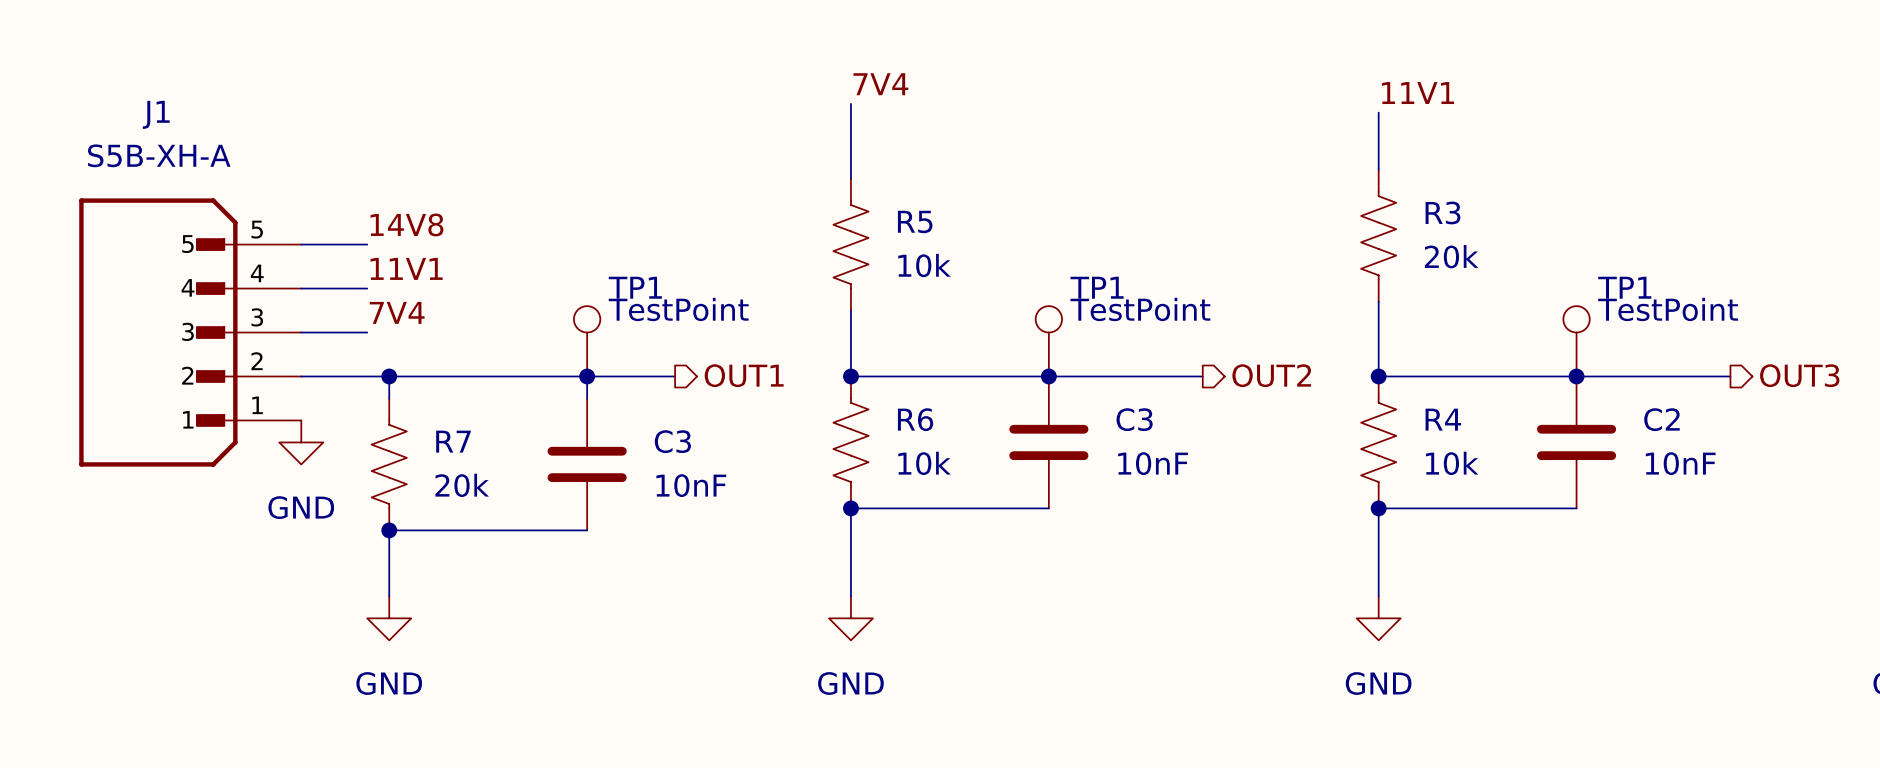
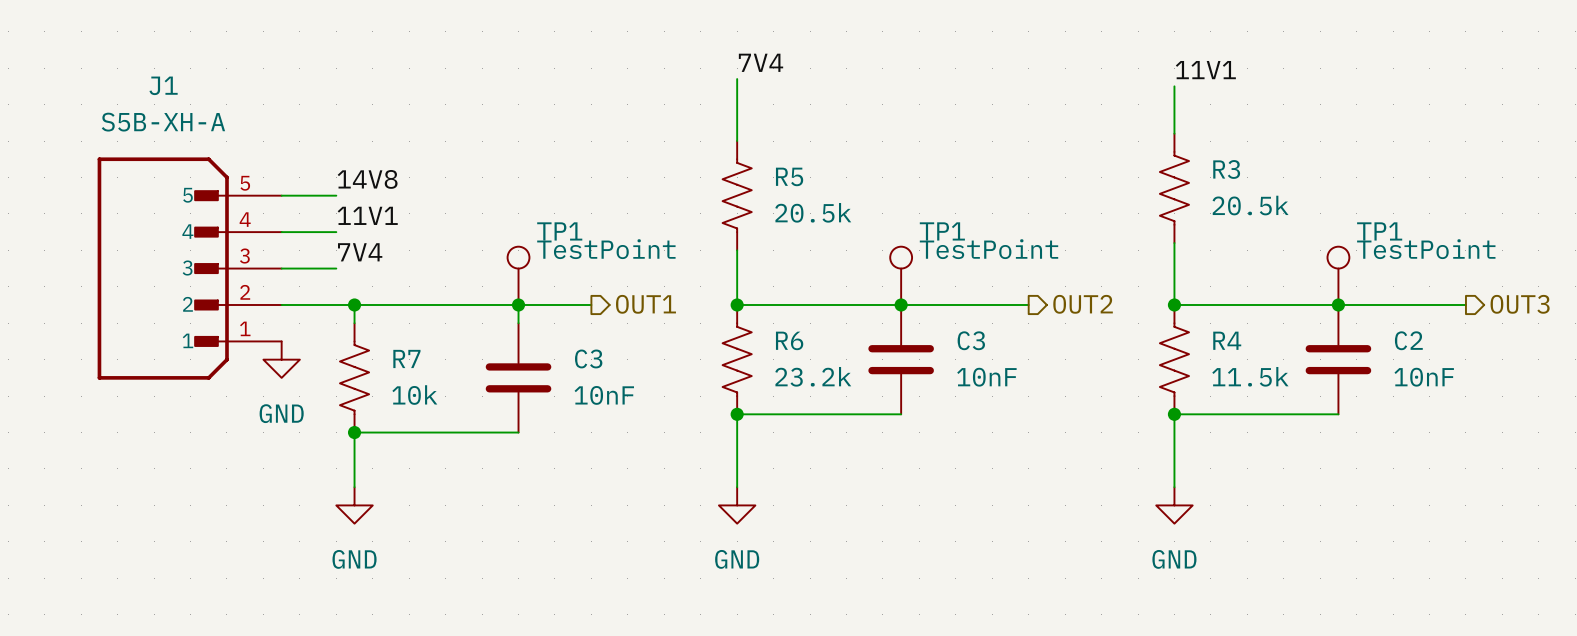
R3 value: 20k (1451, 256) -> 20.5k (1250, 205)
R5 value: 10k (924, 265) -> 20.5k (813, 212)
R6 value: 10k (924, 463) -> 23.2k (813, 376)
R4 value: 10k (1452, 463) -> 11.5k (1250, 376)
R7 value: 20k (462, 485) -> 10k (414, 395)

